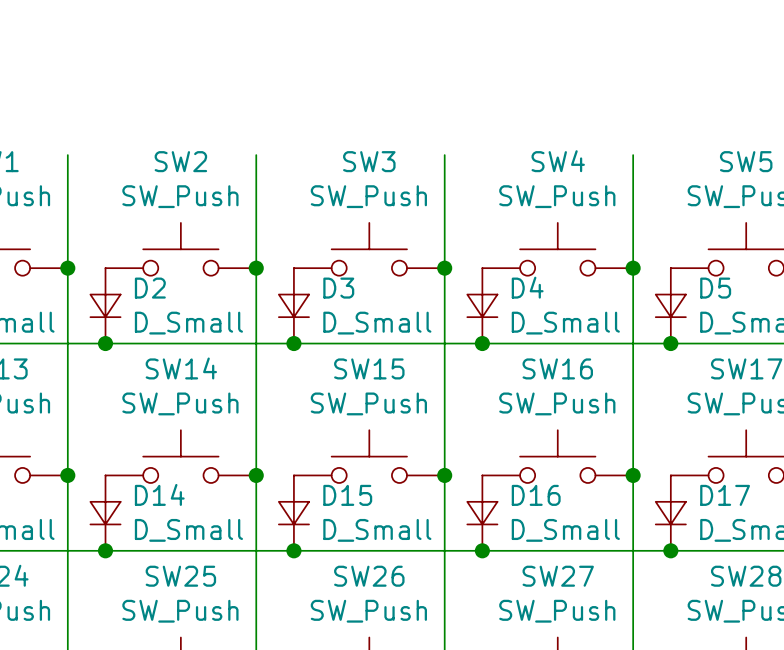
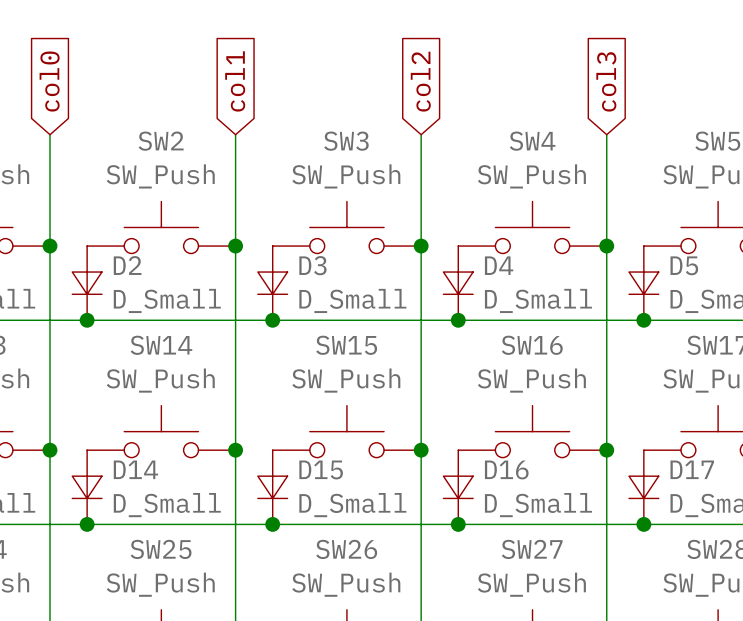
global label: none -> col0 (49, 81)
global label: none -> col1 (235, 81)
global label: none -> col2 (420, 81)
global label: none -> col3 (606, 81)

